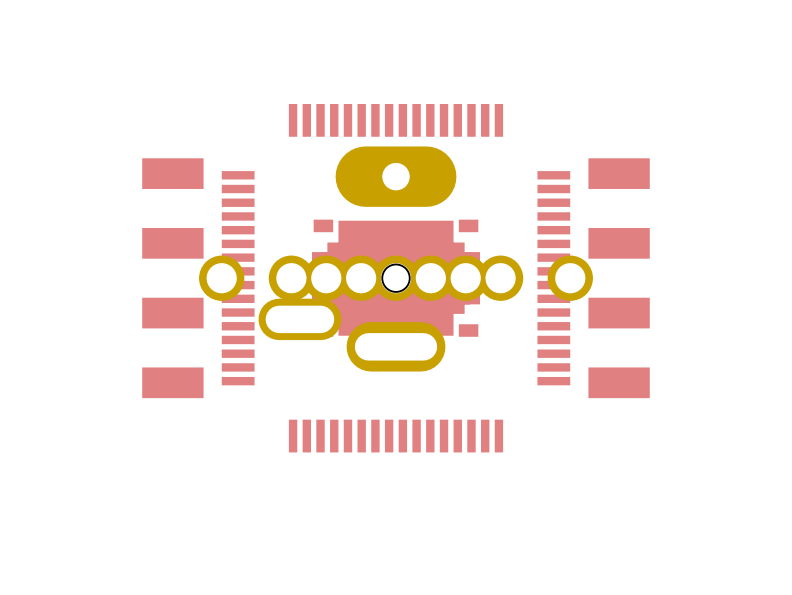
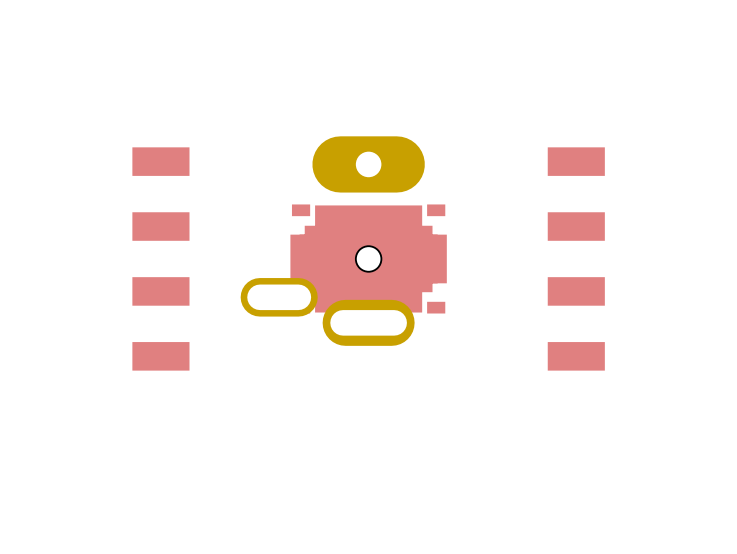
part: (396, 278) -> none
part: (396, 278) -> none
part: (396, 278) -> none

